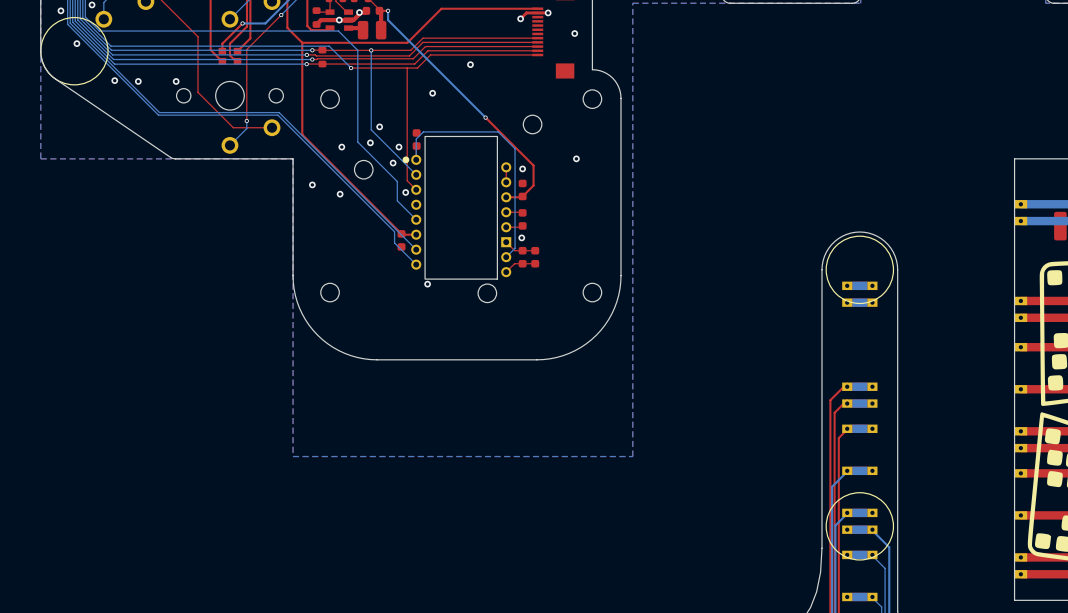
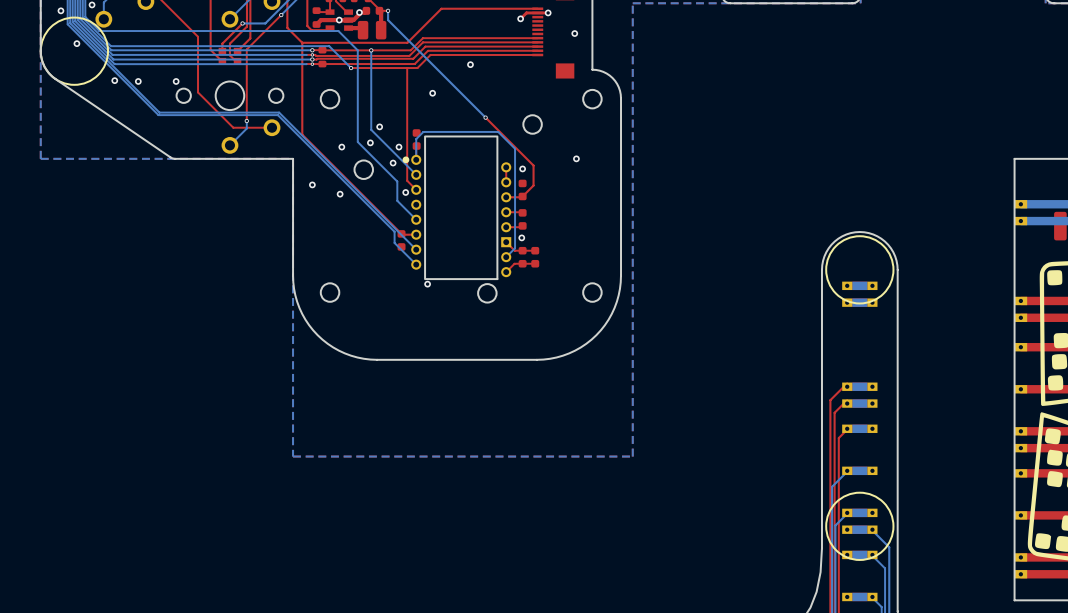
via: (306, 54) -> none
via: none -> (312, 54)
via: (306, 64) -> none
via: none -> (312, 64)

